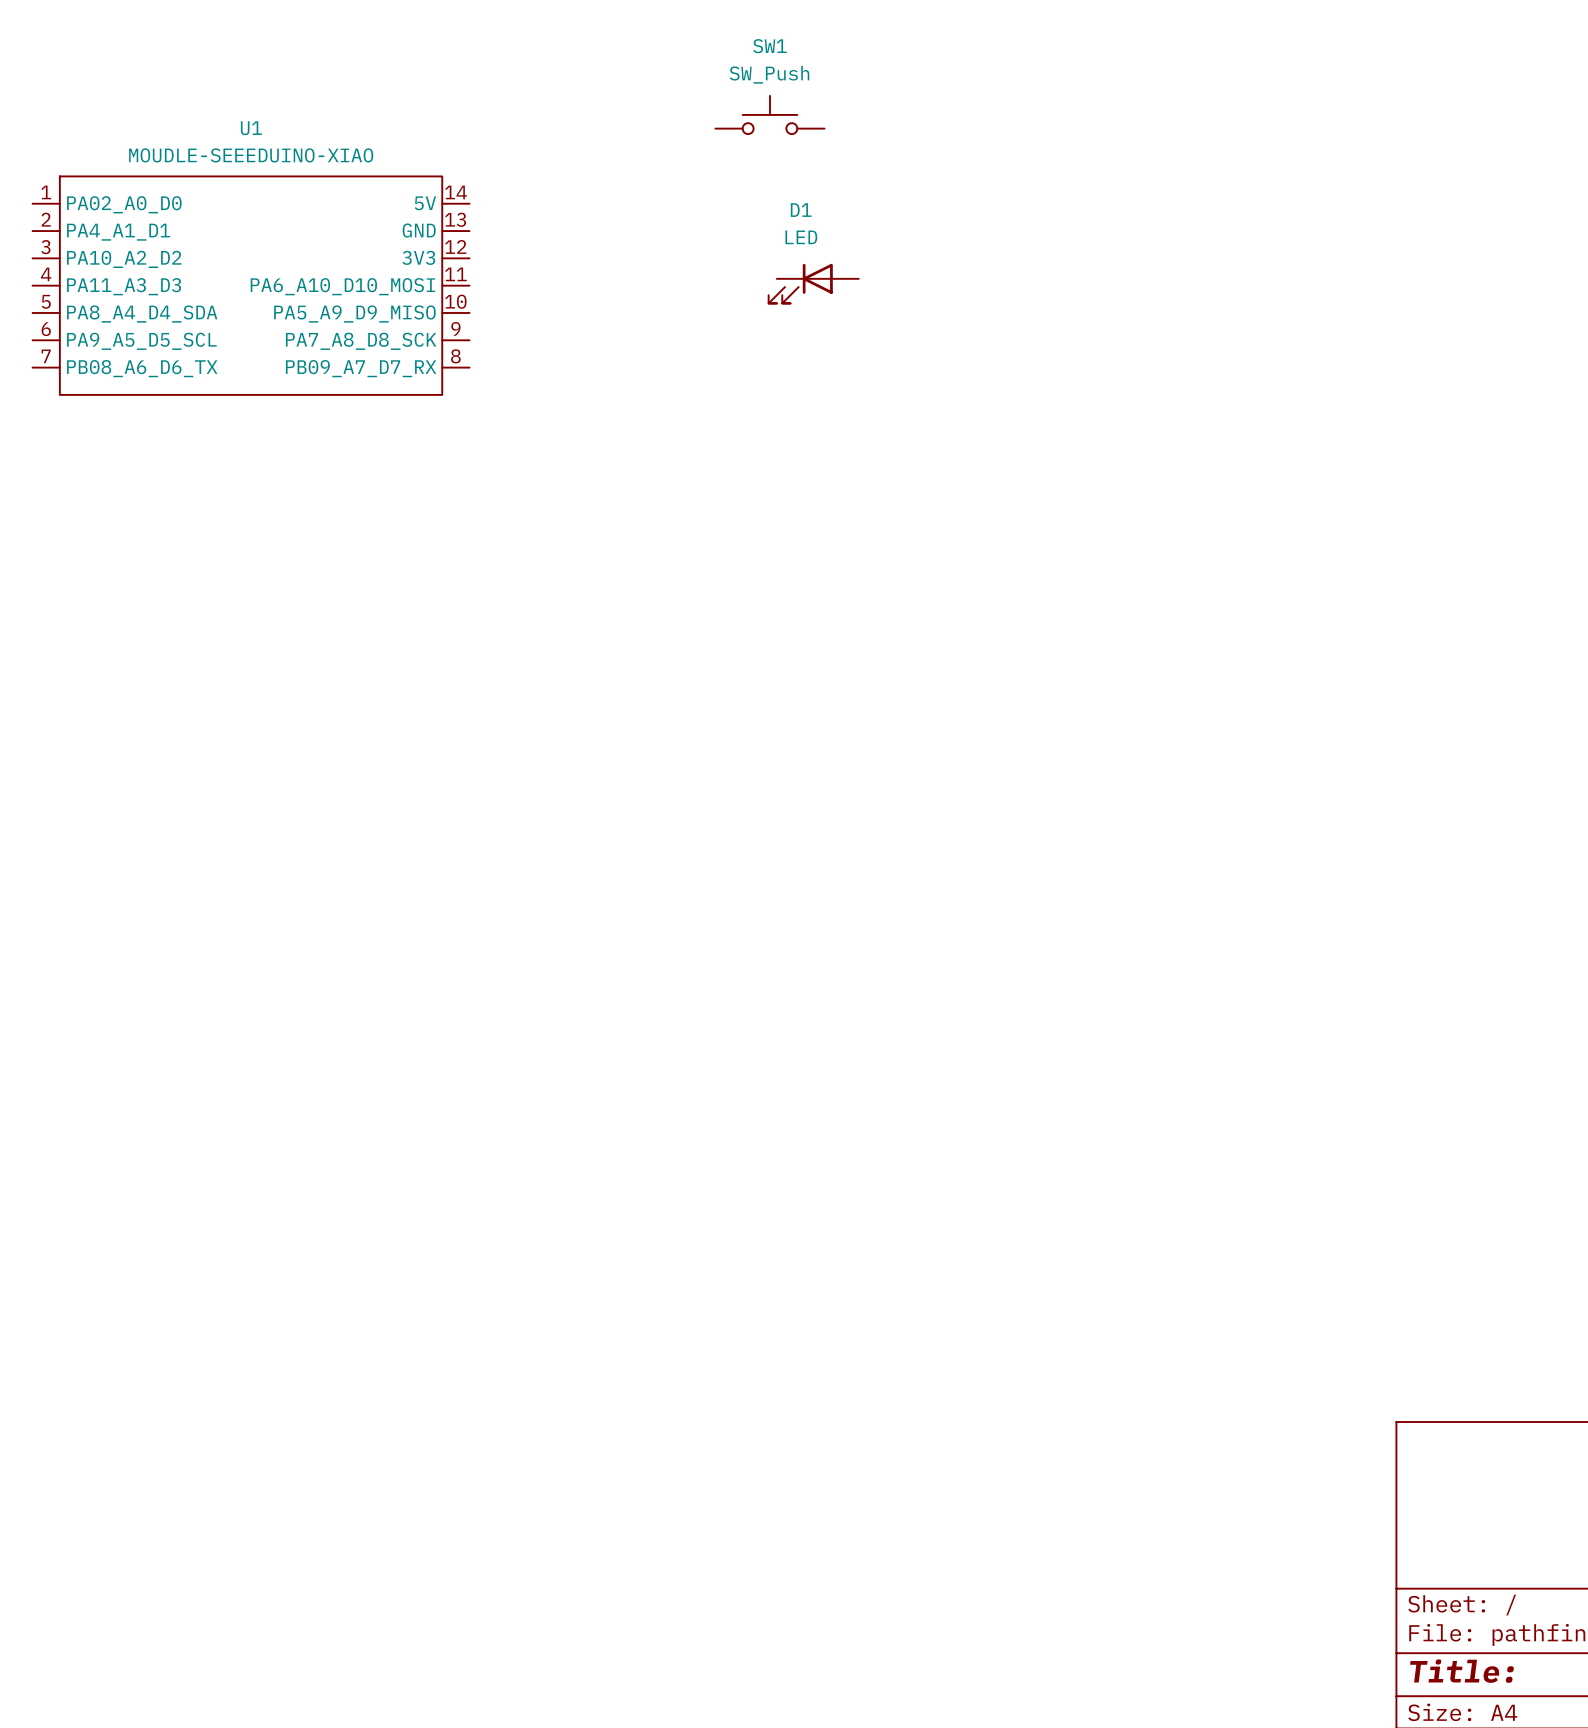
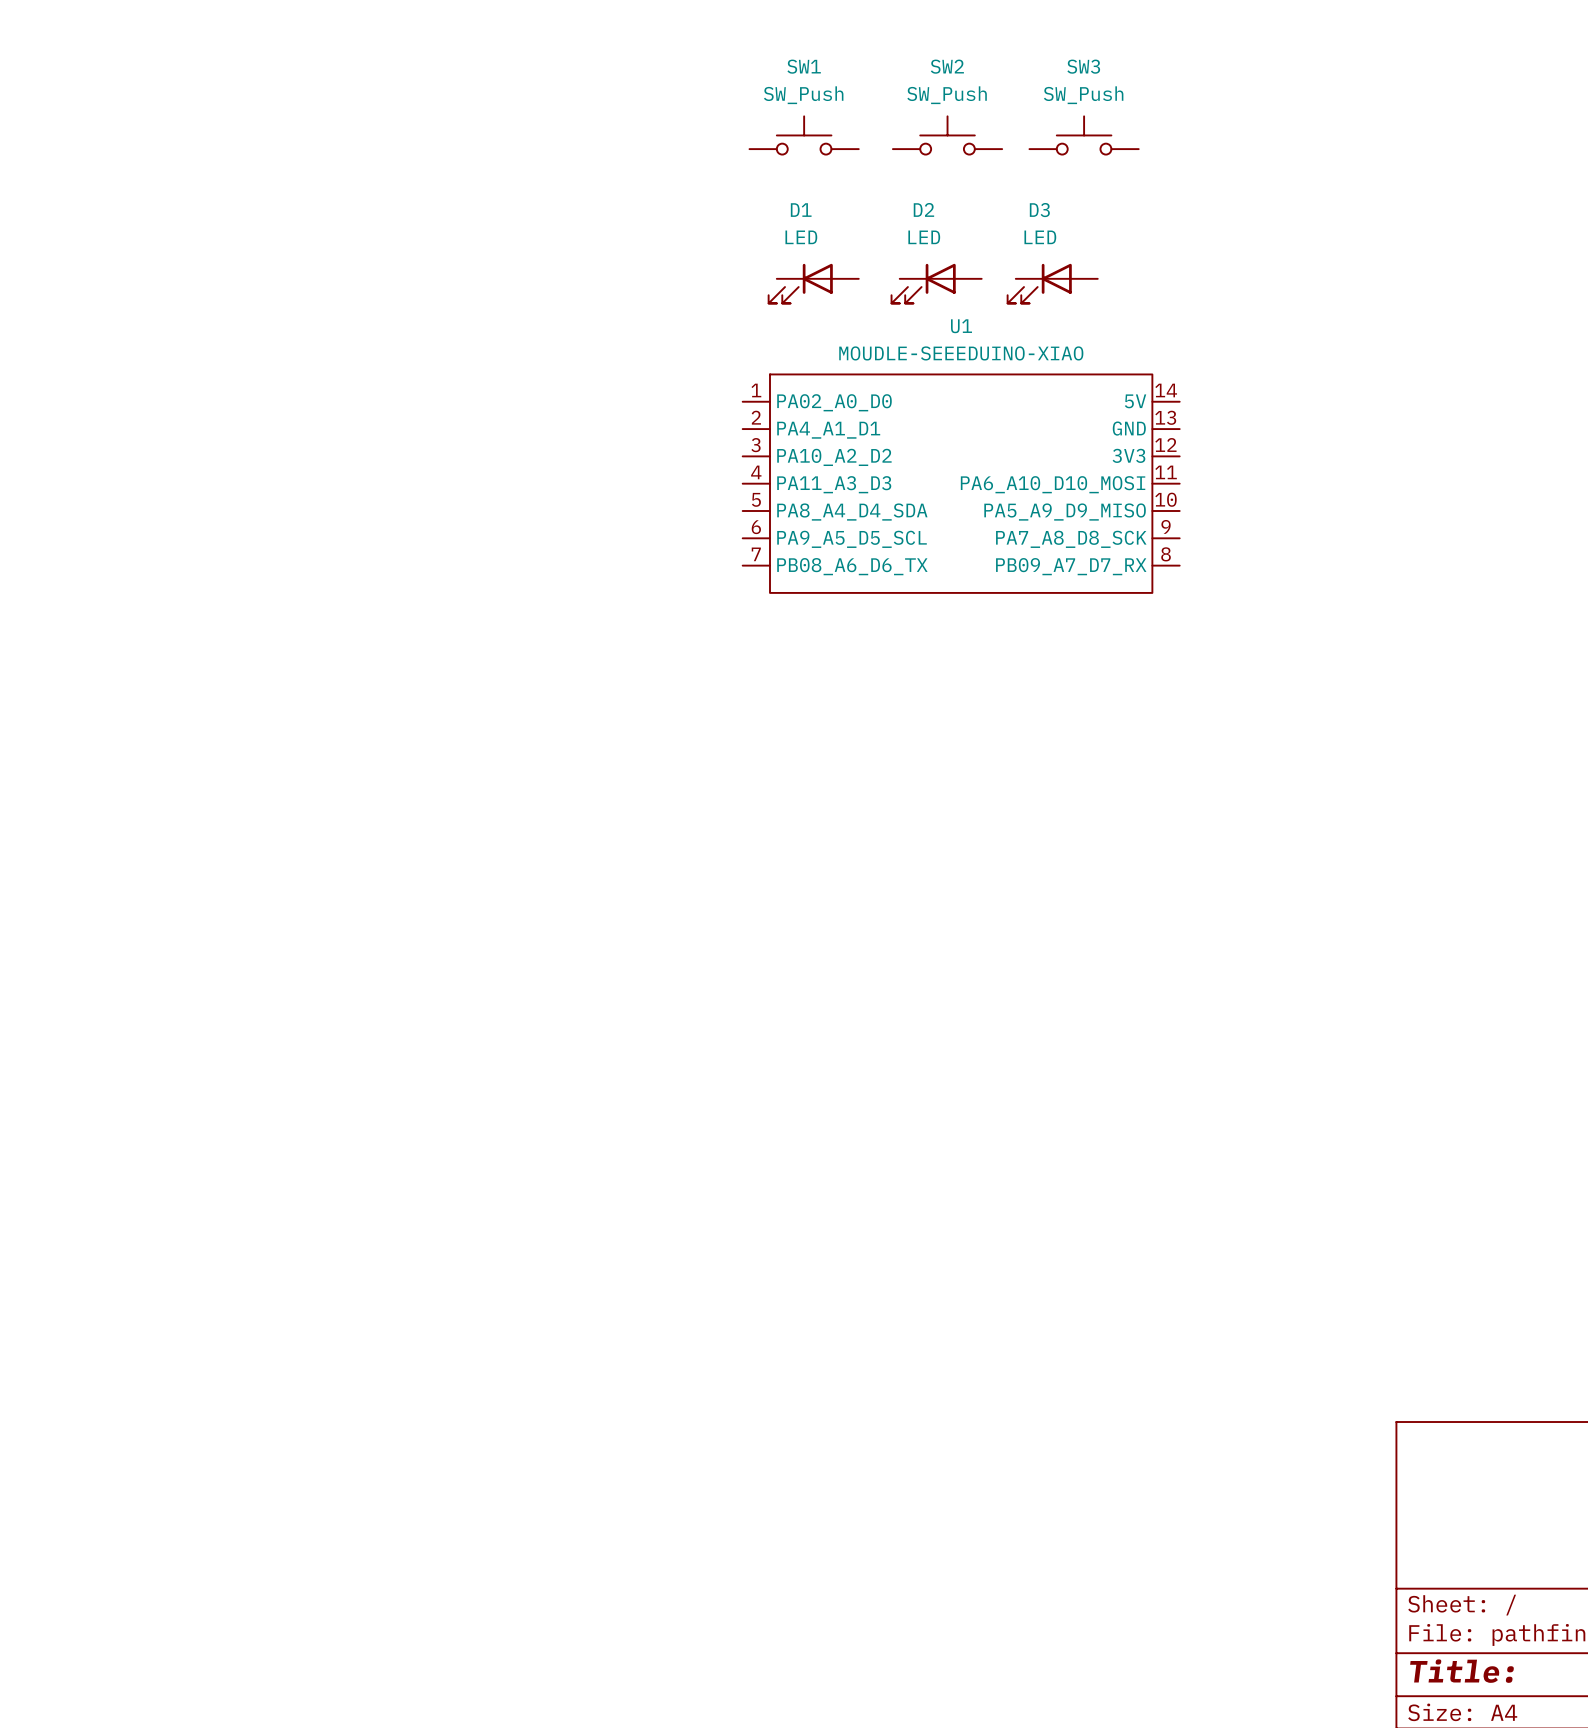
SW1 position: (769, 114) -> (804, 135)
SW2: none -> SW_Push (947, 135)
SW3: none -> SW_Push (1084, 135)
D2: none -> LED (936, 283)
D3: none -> LED (1052, 283)
U1 position: (251, 285) -> (961, 483)

